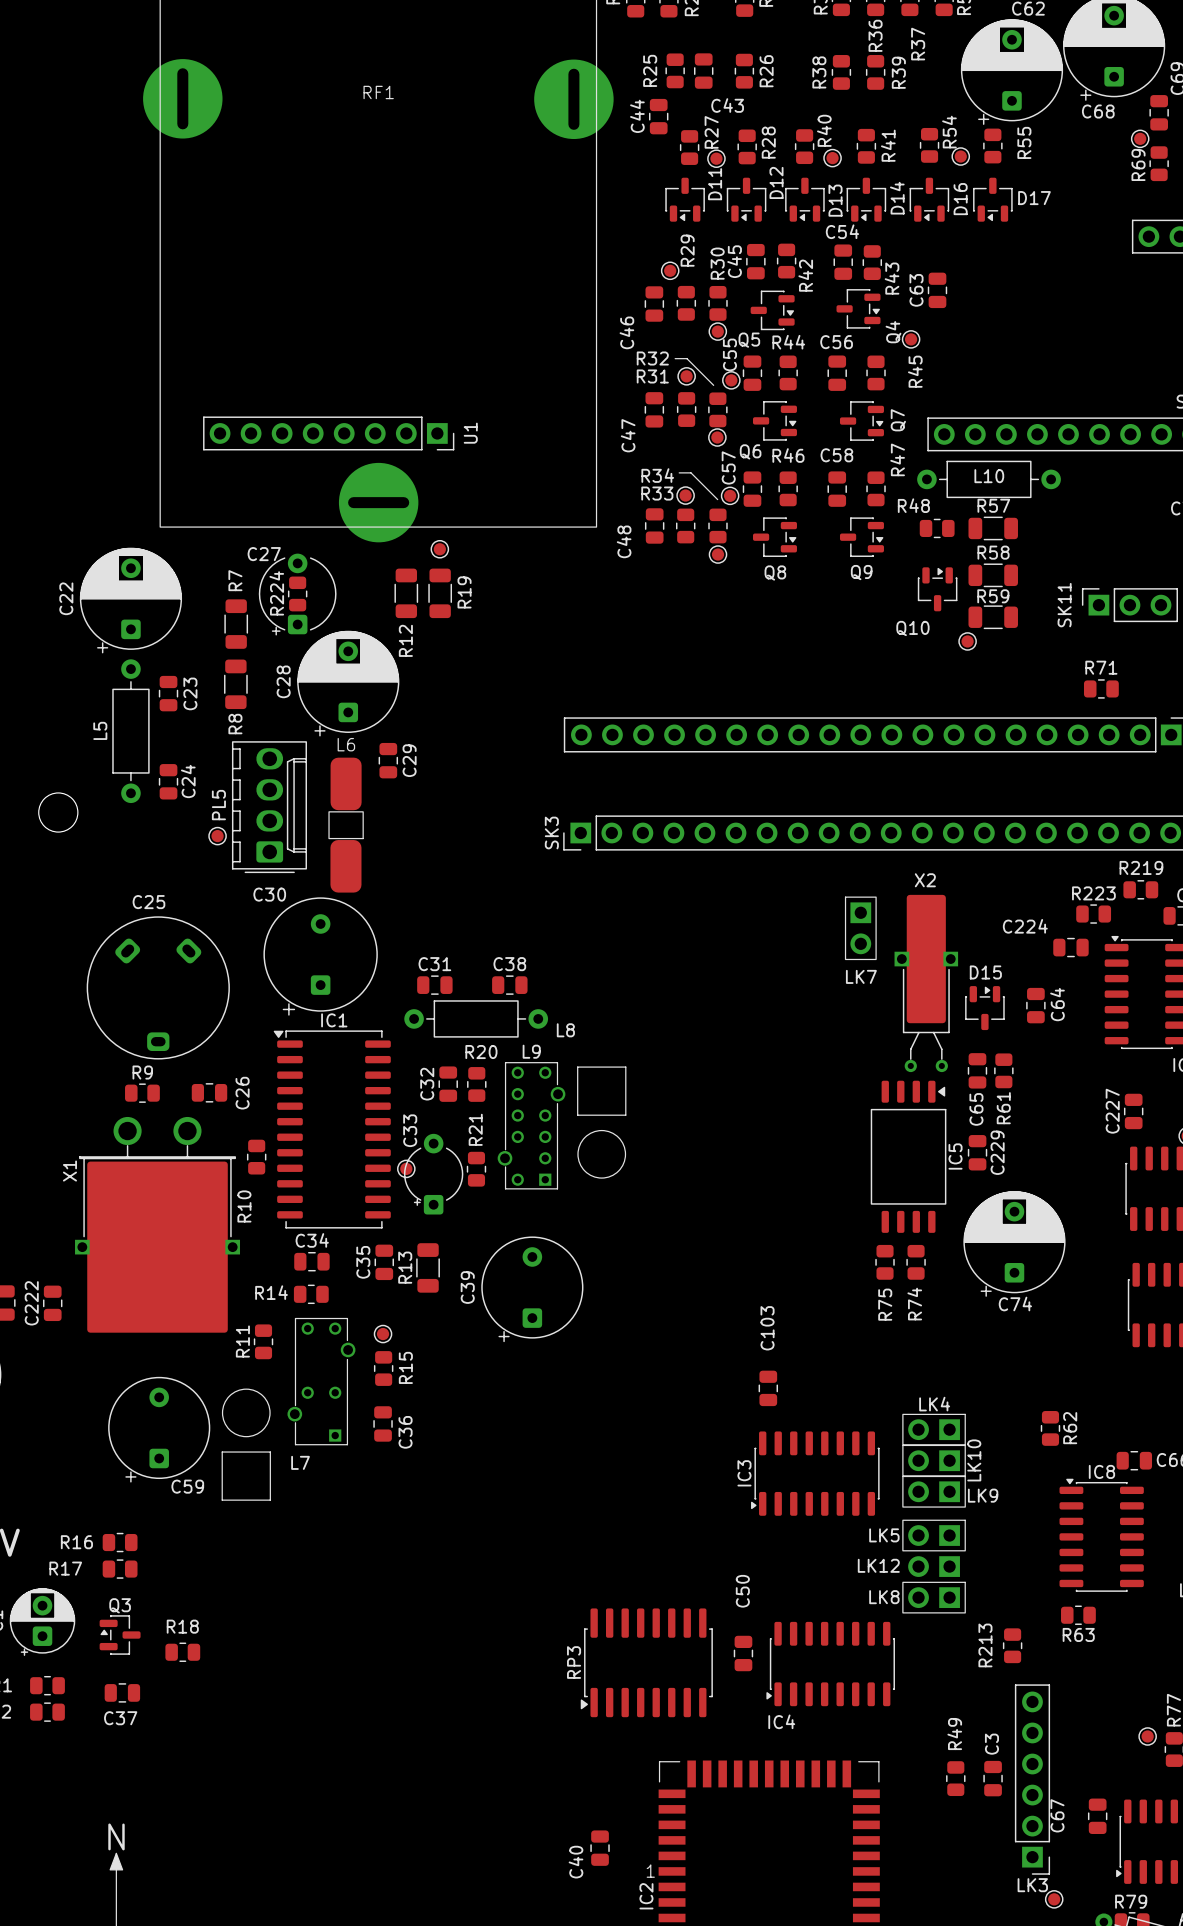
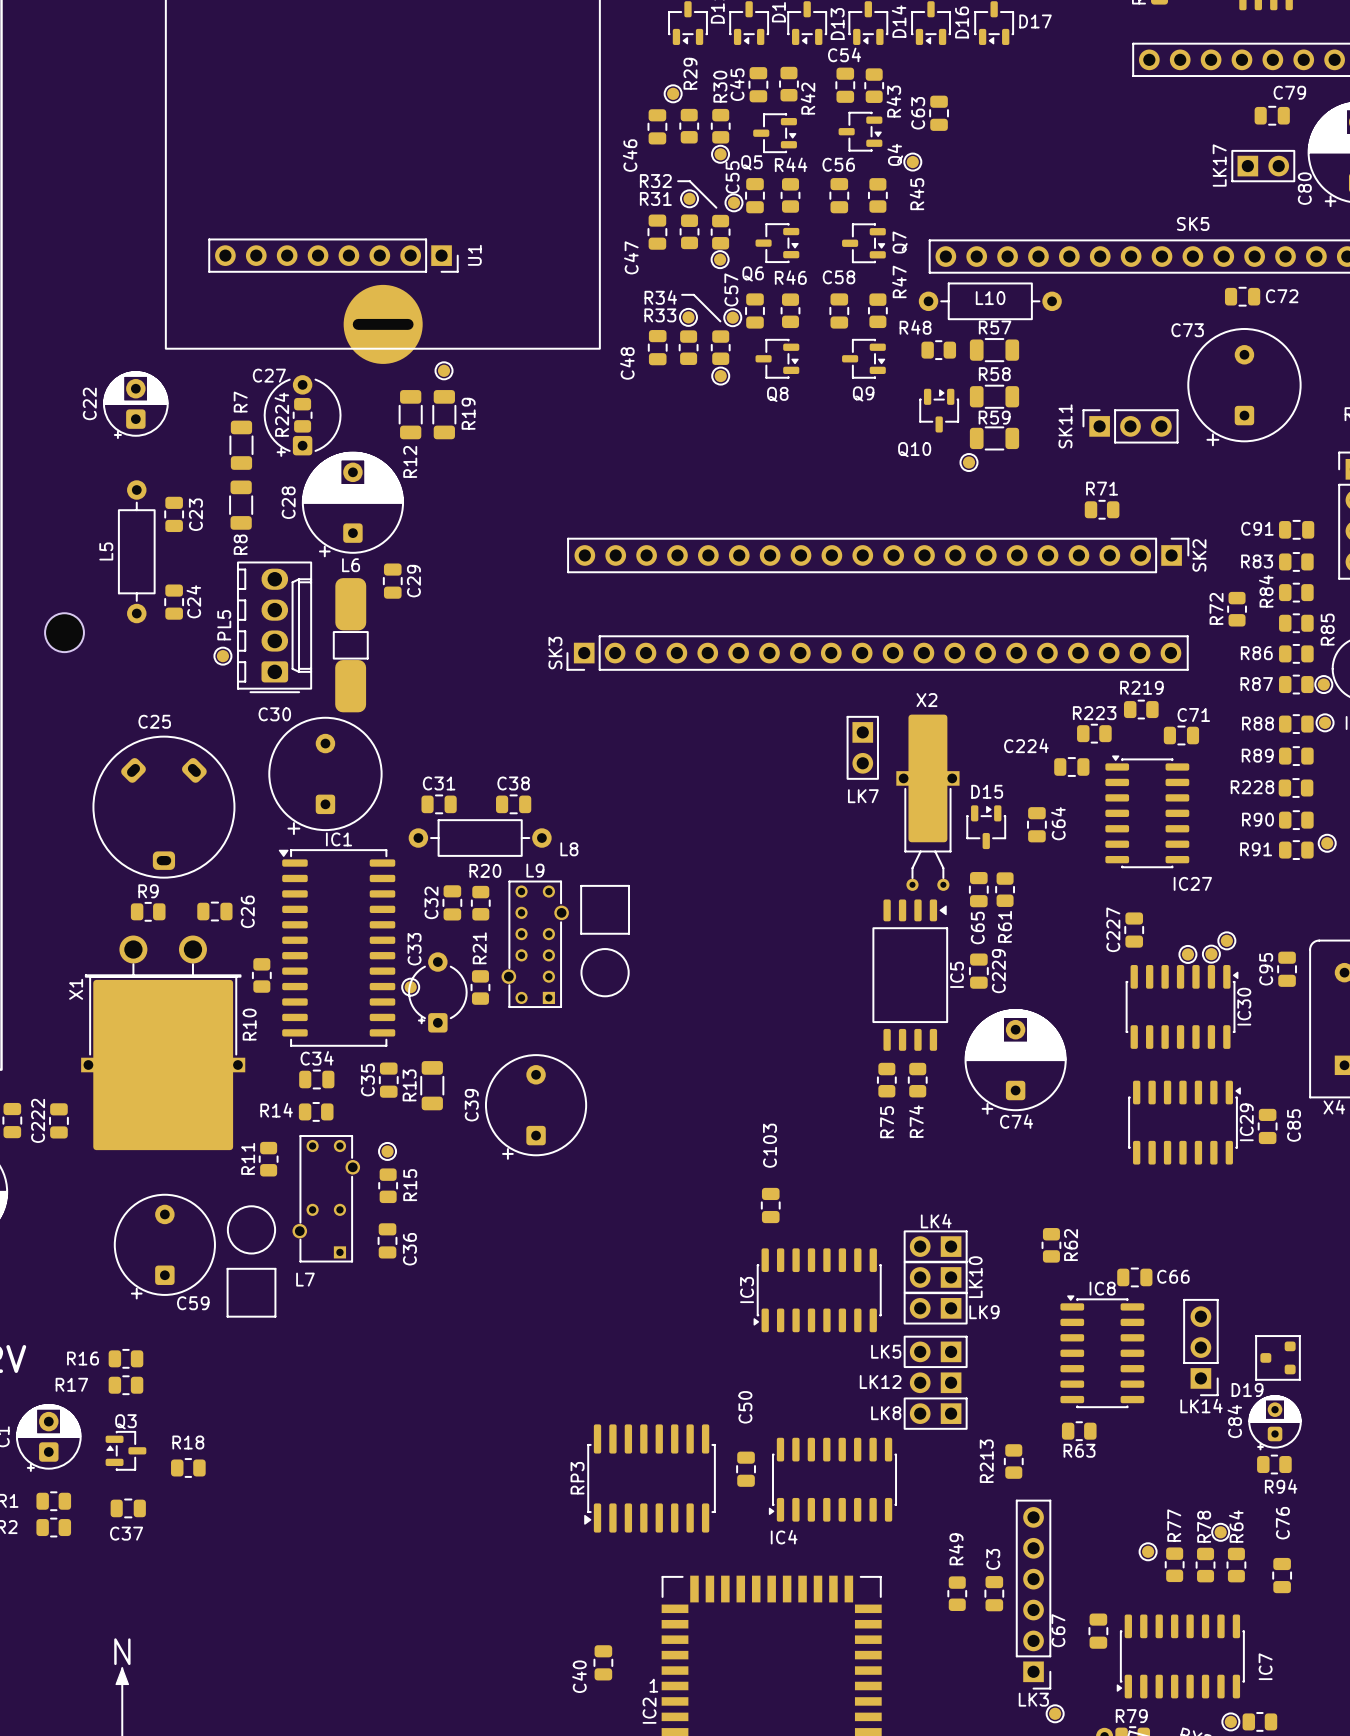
C22 footprint: [79, 547, 183, 654] -> [103, 371, 169, 439]

